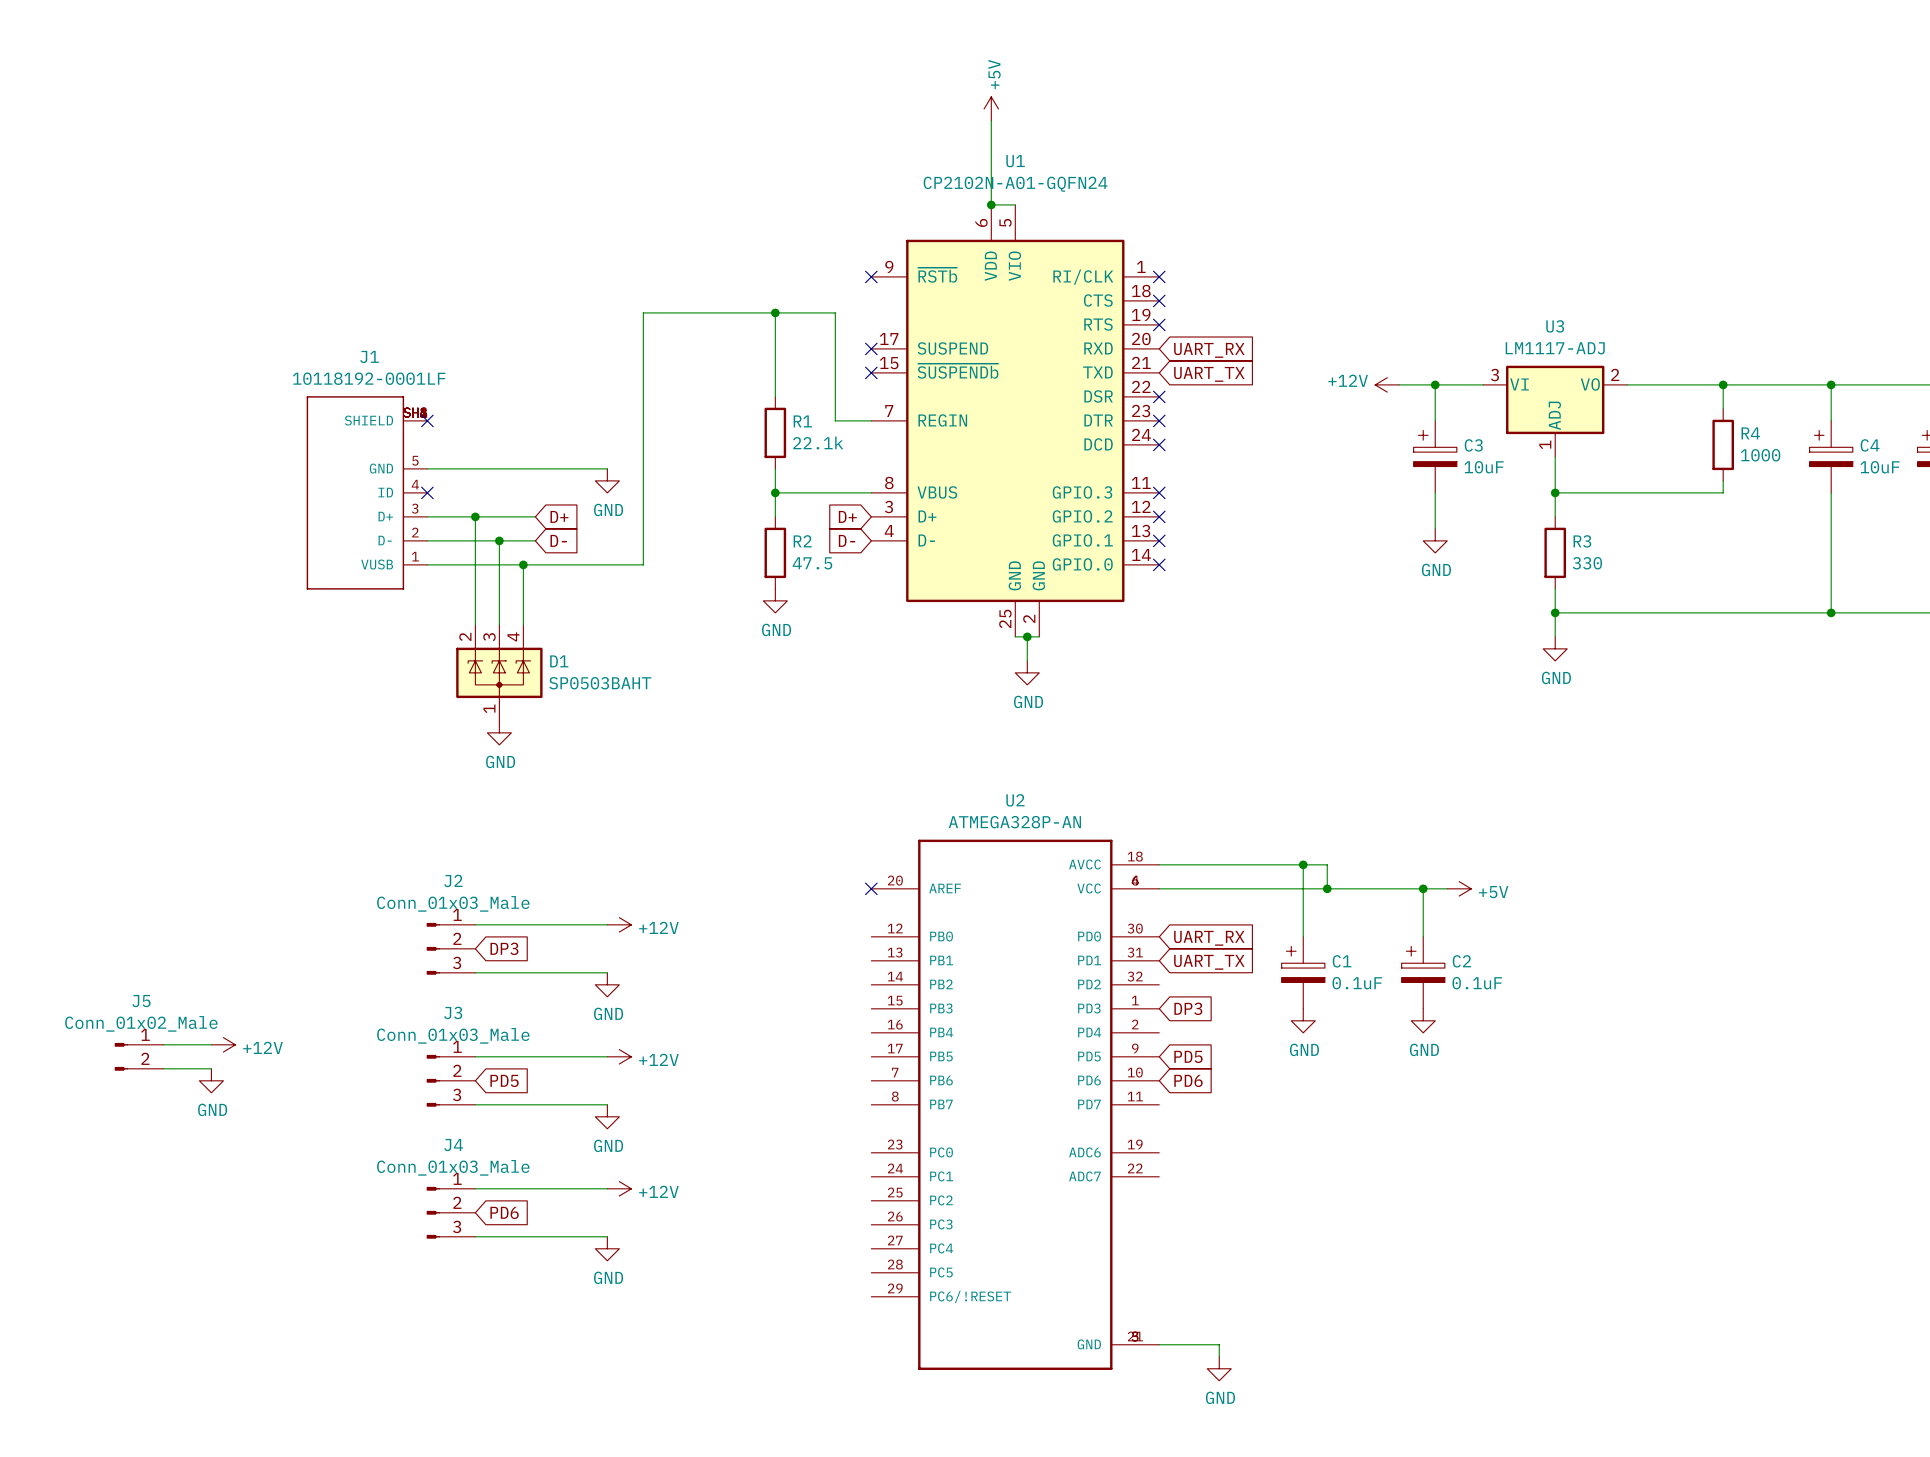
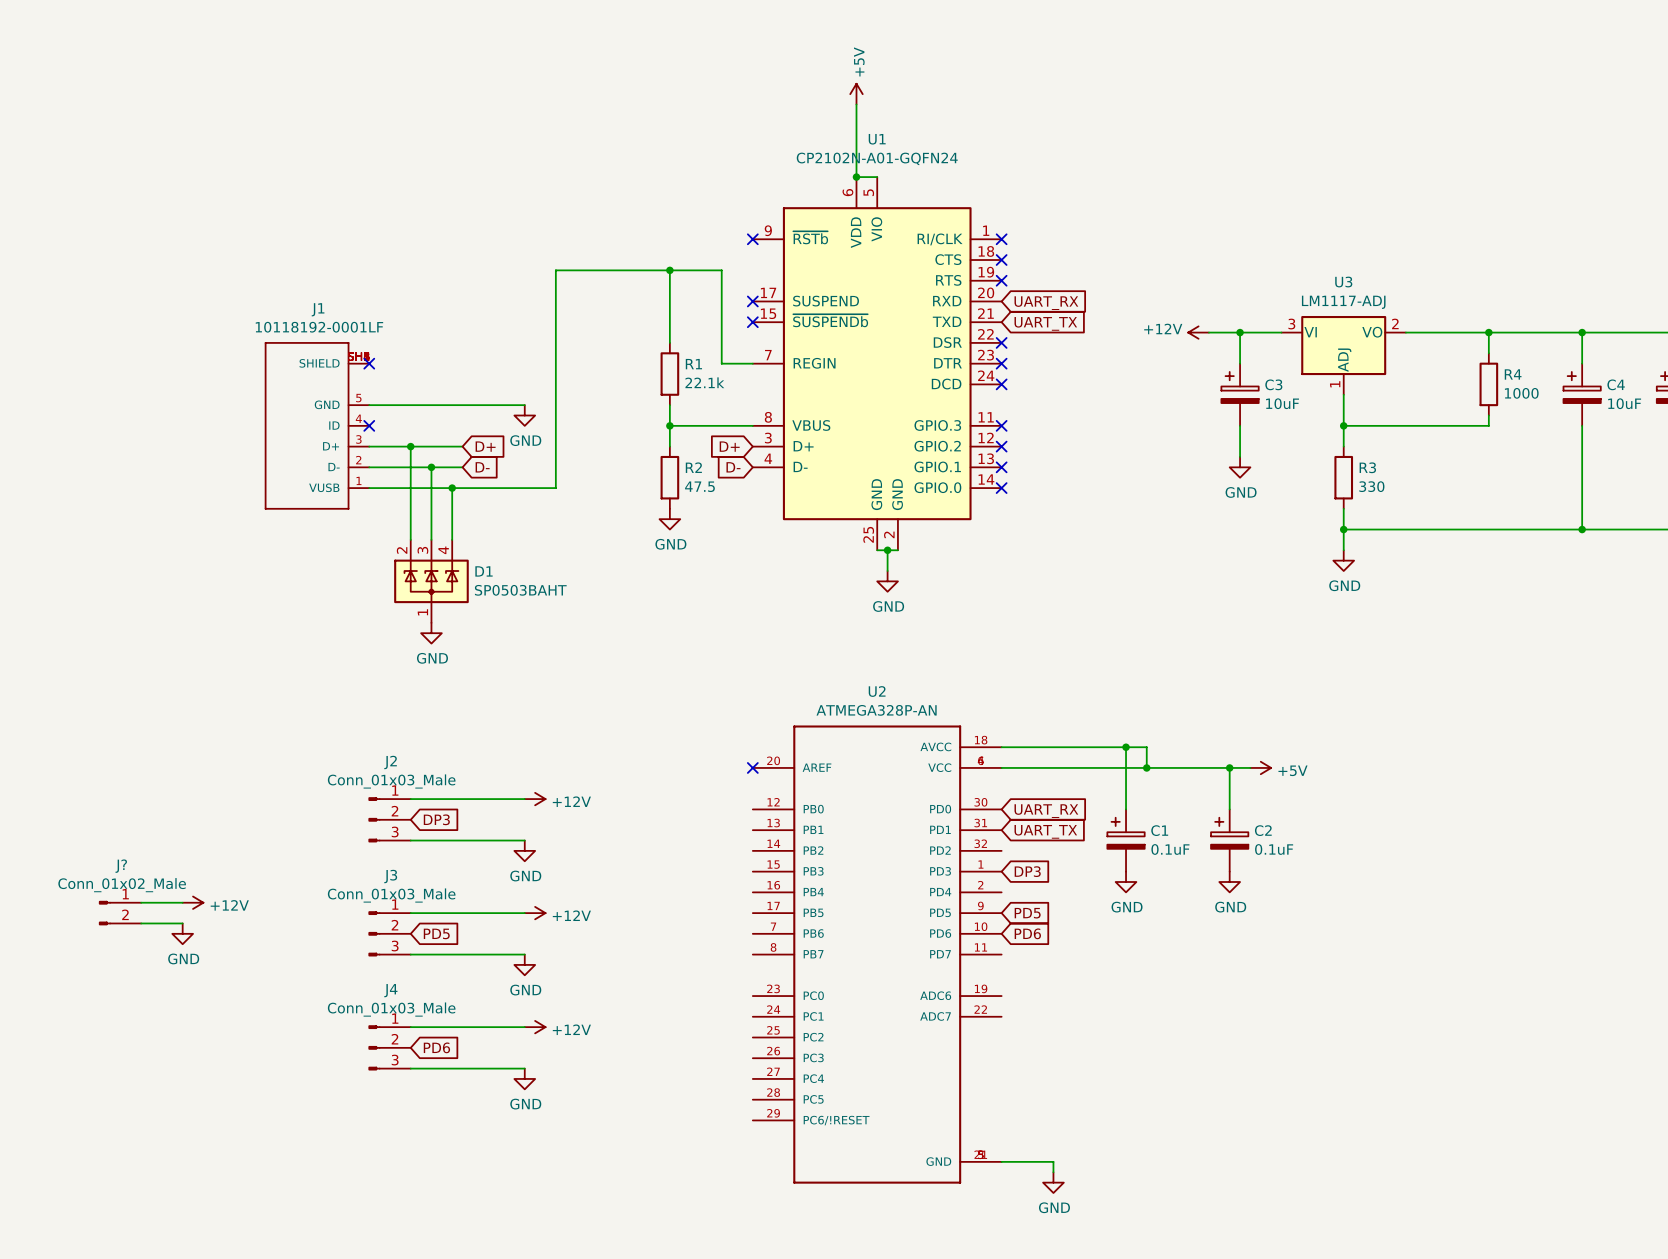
J5 name: J5 (141, 1001) -> J? (121, 866)

